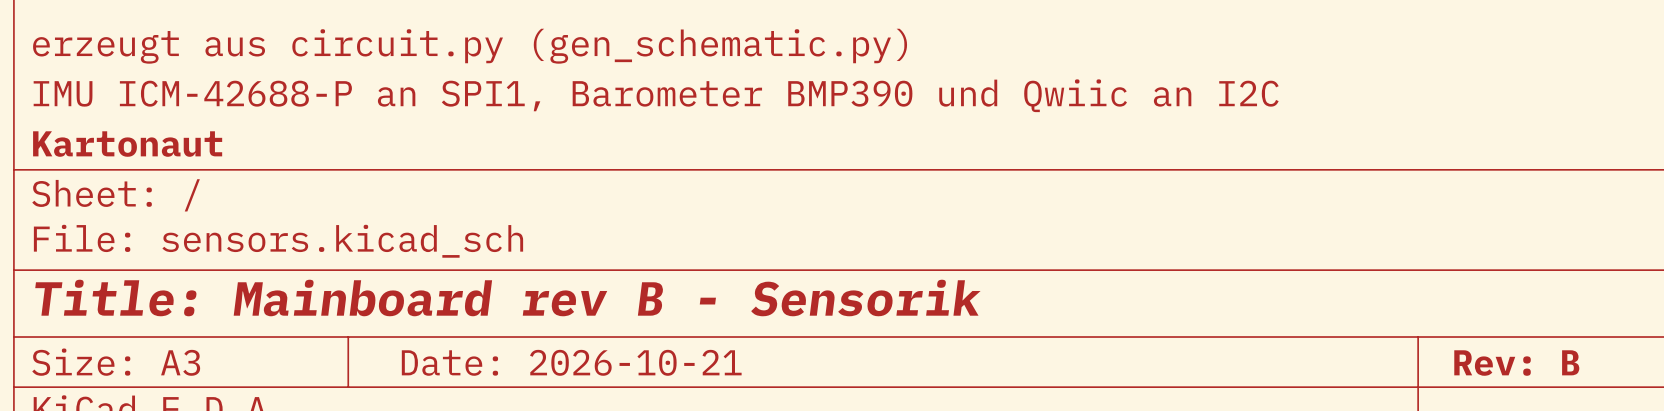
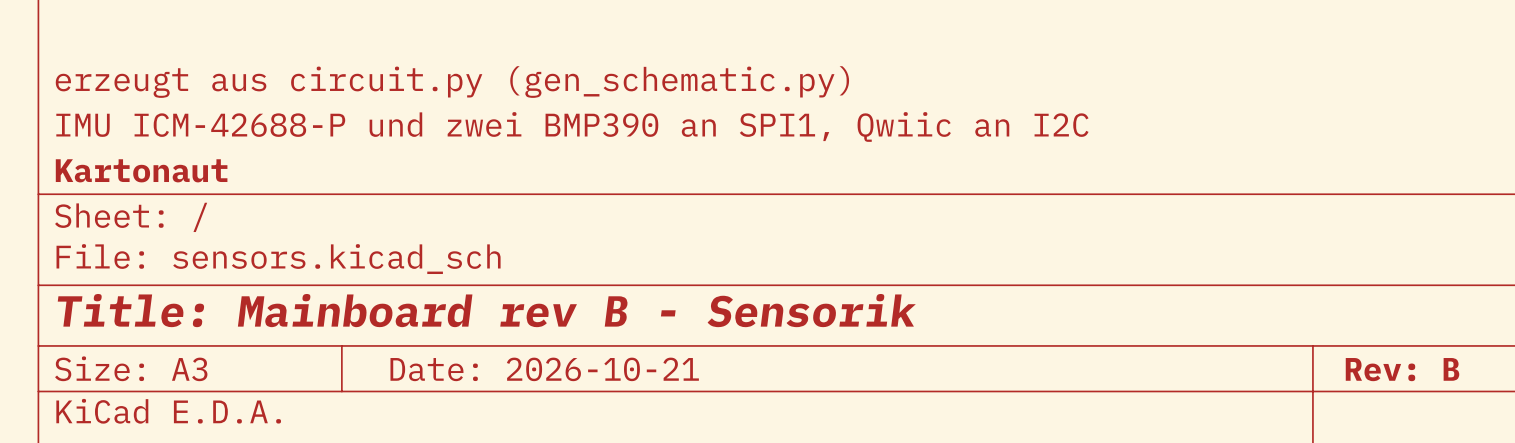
title block: IMU ICM-42688-P an SPI1, Barometer BMP390 und Qwiic an I2C (656, 95) -> IMU ICM-42688-P und zwei BMP390 an SPI1, Qwiic an I2C (572, 126)

